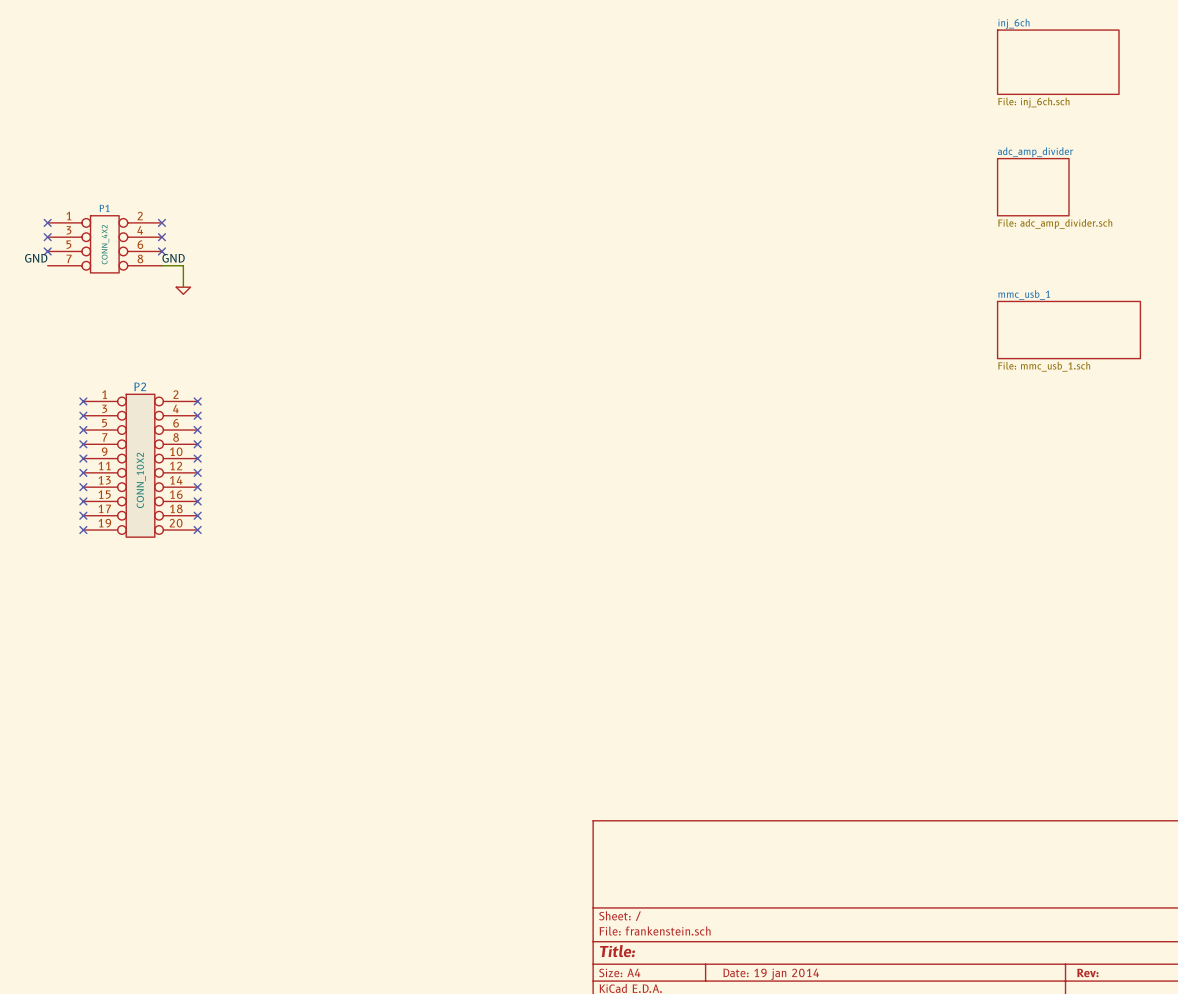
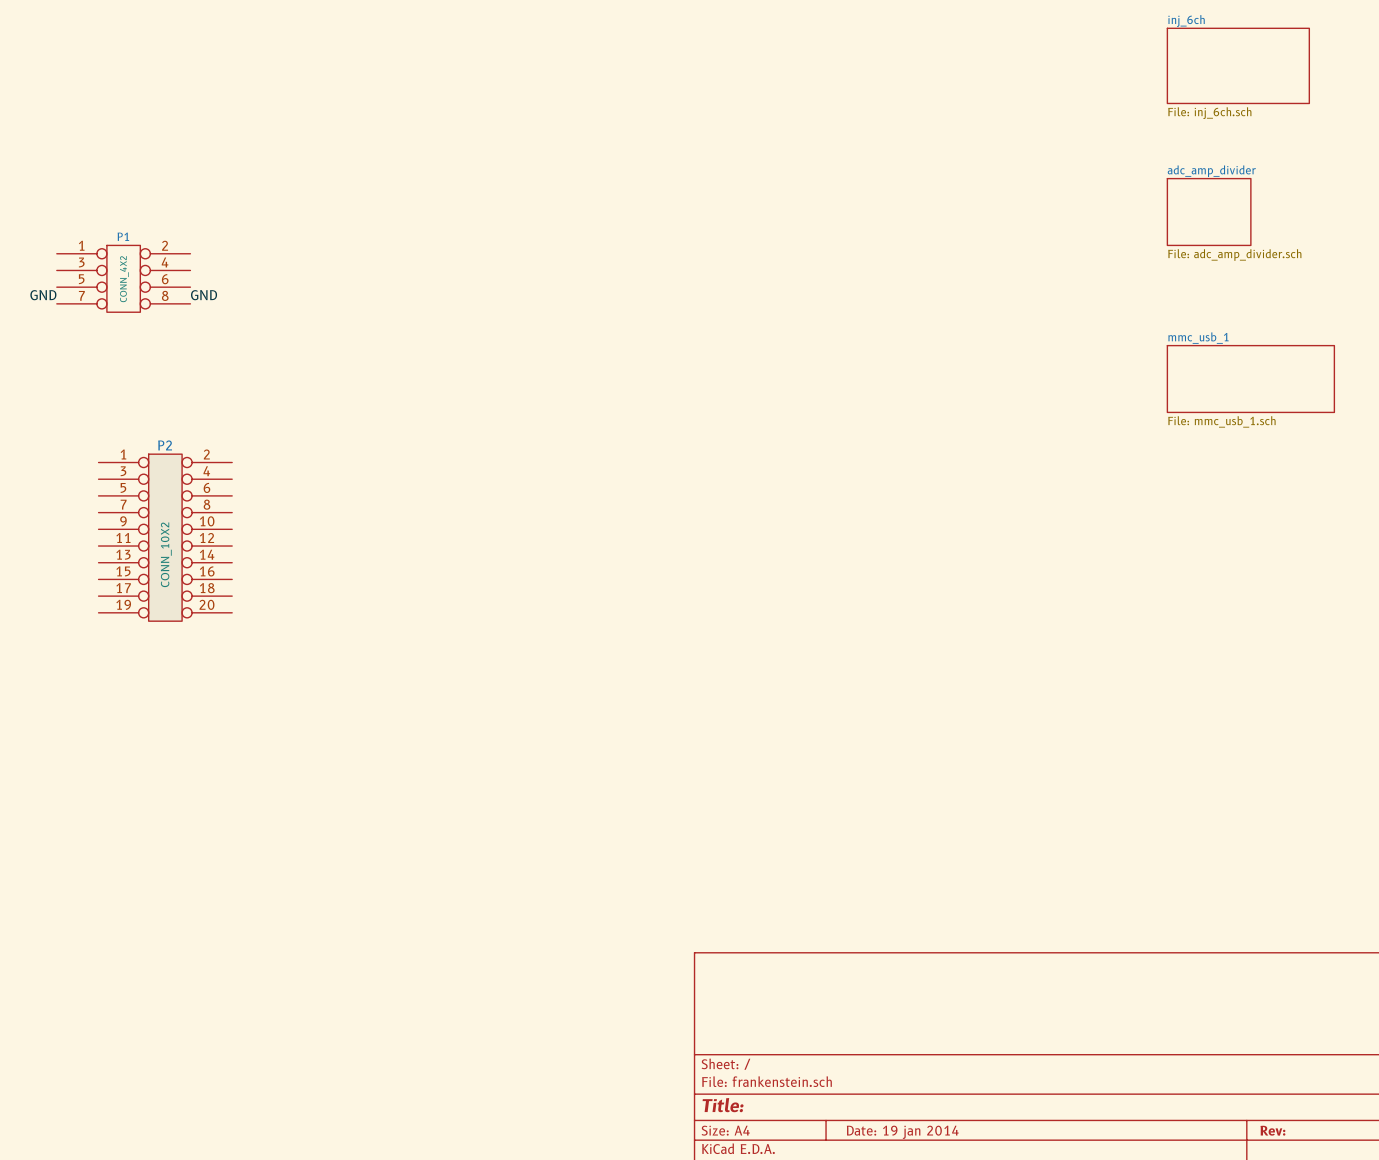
no-connect mark: (47, 222) -> none
no-connect mark: (161, 222) -> none
no-connect mark: (47, 237) -> none
no-connect mark: (161, 237) -> none
no-connect mark: (47, 251) -> none
no-connect mark: (161, 251) -> none
wire: (161, 265) (183, 265) (183, 287) -> none
power symbol: (183, 290) -> none
no-connect mark: (83, 401) -> none
no-connect mark: (197, 401) -> none
no-connect mark: (83, 415) -> none
no-connect mark: (197, 415) -> none
no-connect mark: (83, 430) -> none
no-connect mark: (197, 430) -> none
no-connect mark: (83, 444) -> none
no-connect mark: (197, 444) -> none
no-connect mark: (83, 458) -> none
no-connect mark: (197, 458) -> none
no-connect mark: (83, 472) -> none
no-connect mark: (197, 472) -> none
no-connect mark: (83, 487) -> none
no-connect mark: (197, 487) -> none
no-connect mark: (83, 501) -> none
no-connect mark: (197, 501) -> none
no-connect mark: (83, 515) -> none
no-connect mark: (197, 515) -> none
no-connect mark: (83, 530) -> none
no-connect mark: (197, 530) -> none

